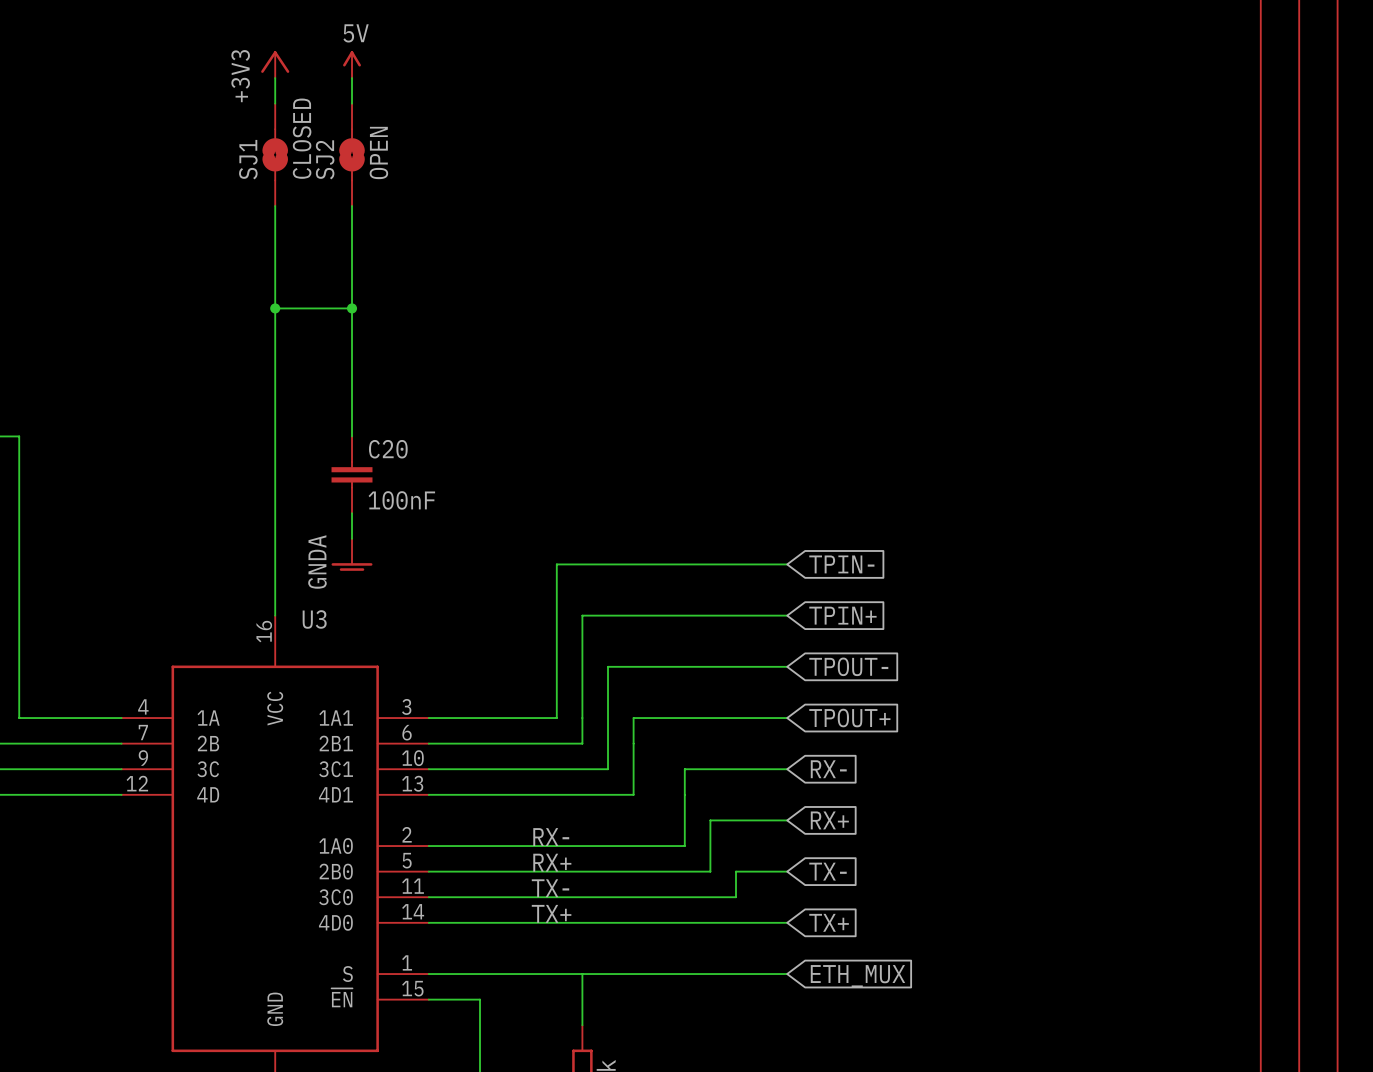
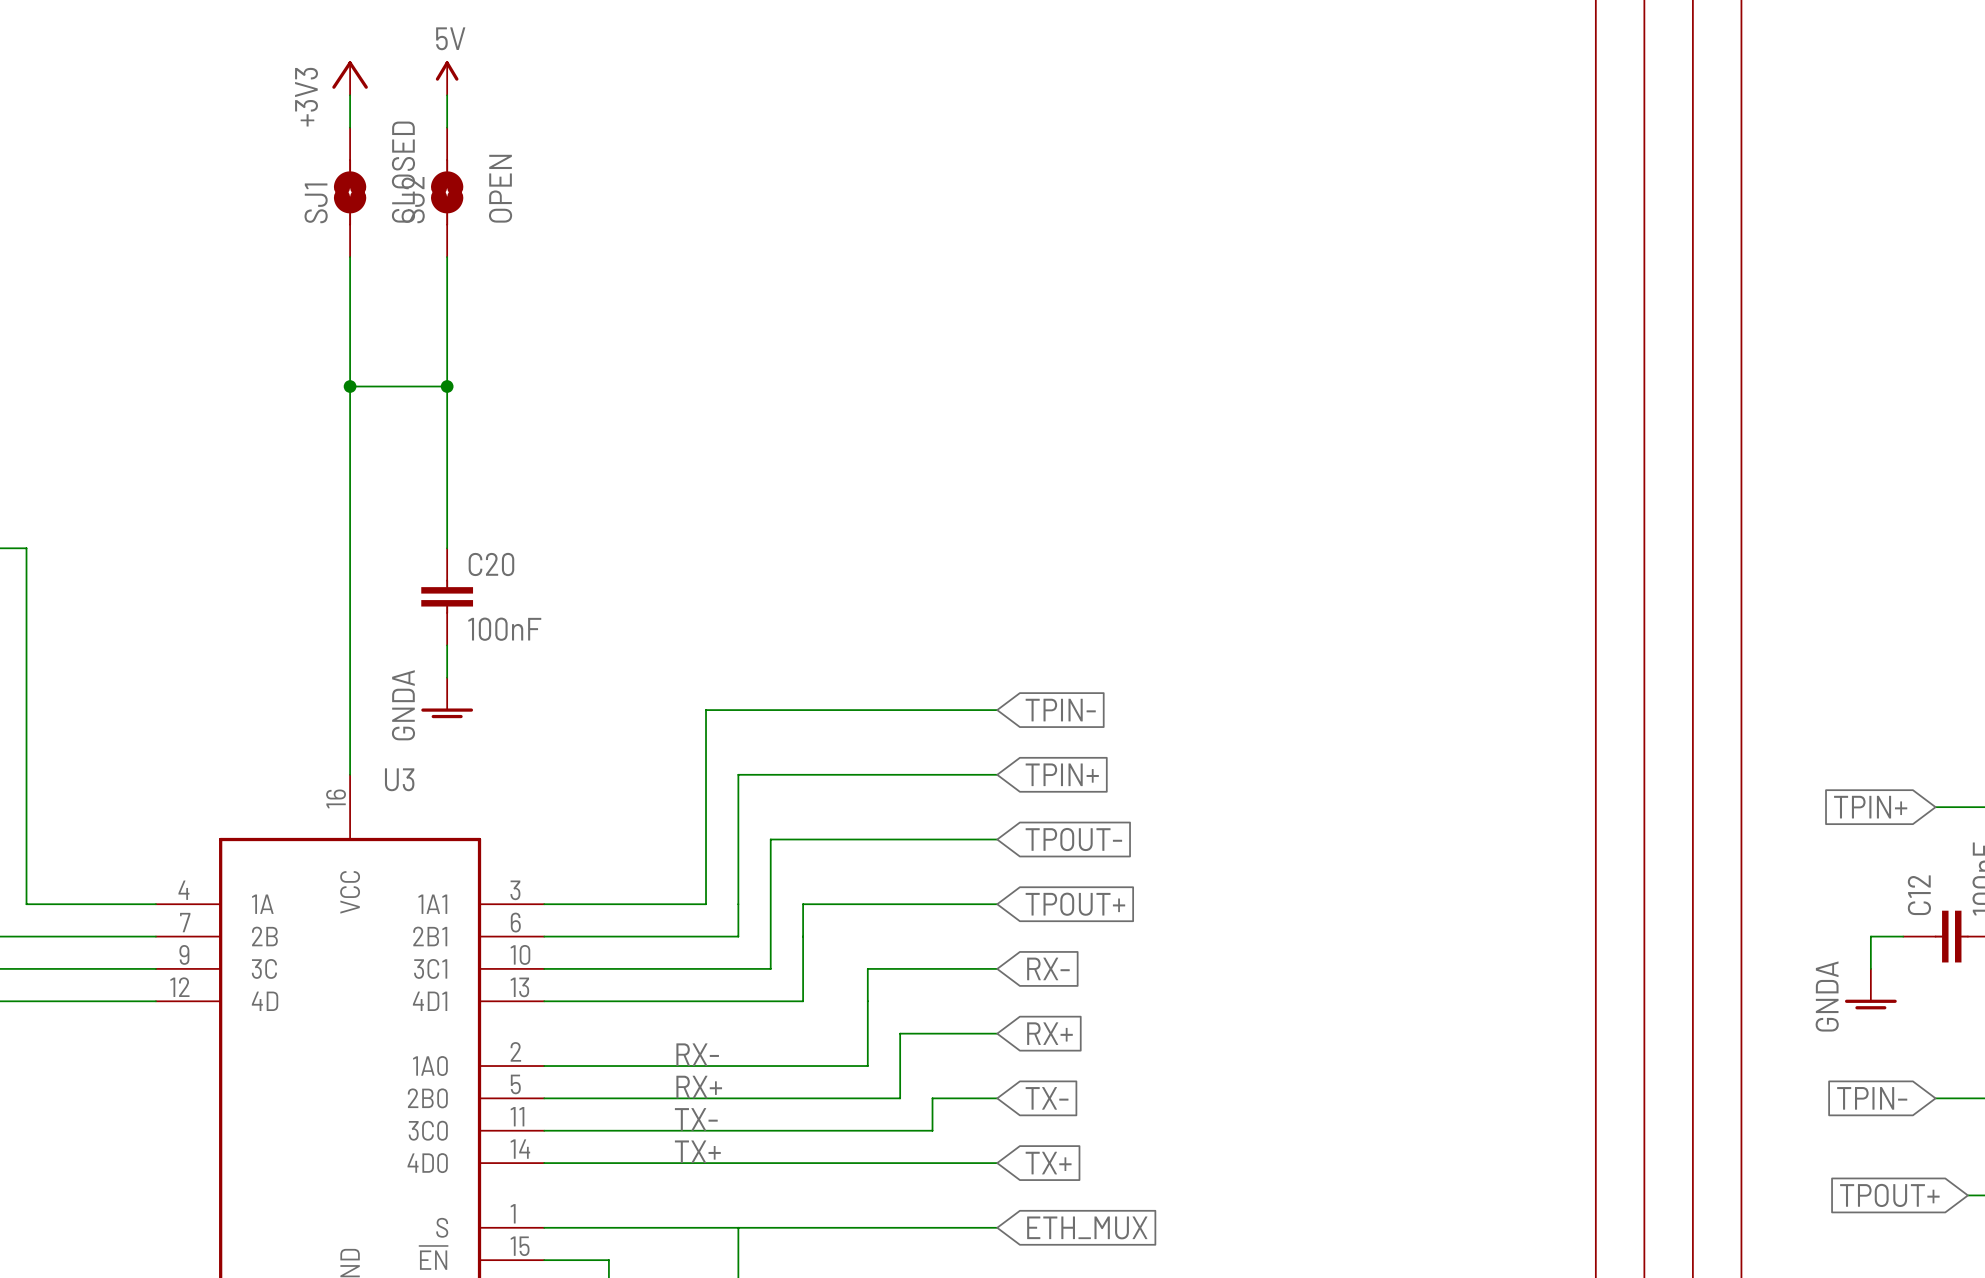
SJ1 value position: CLOSED (302, 138) -> CLOSED (403, 172)
SJ2 value position: OPEN (378, 152) -> OPEN (500, 188)

